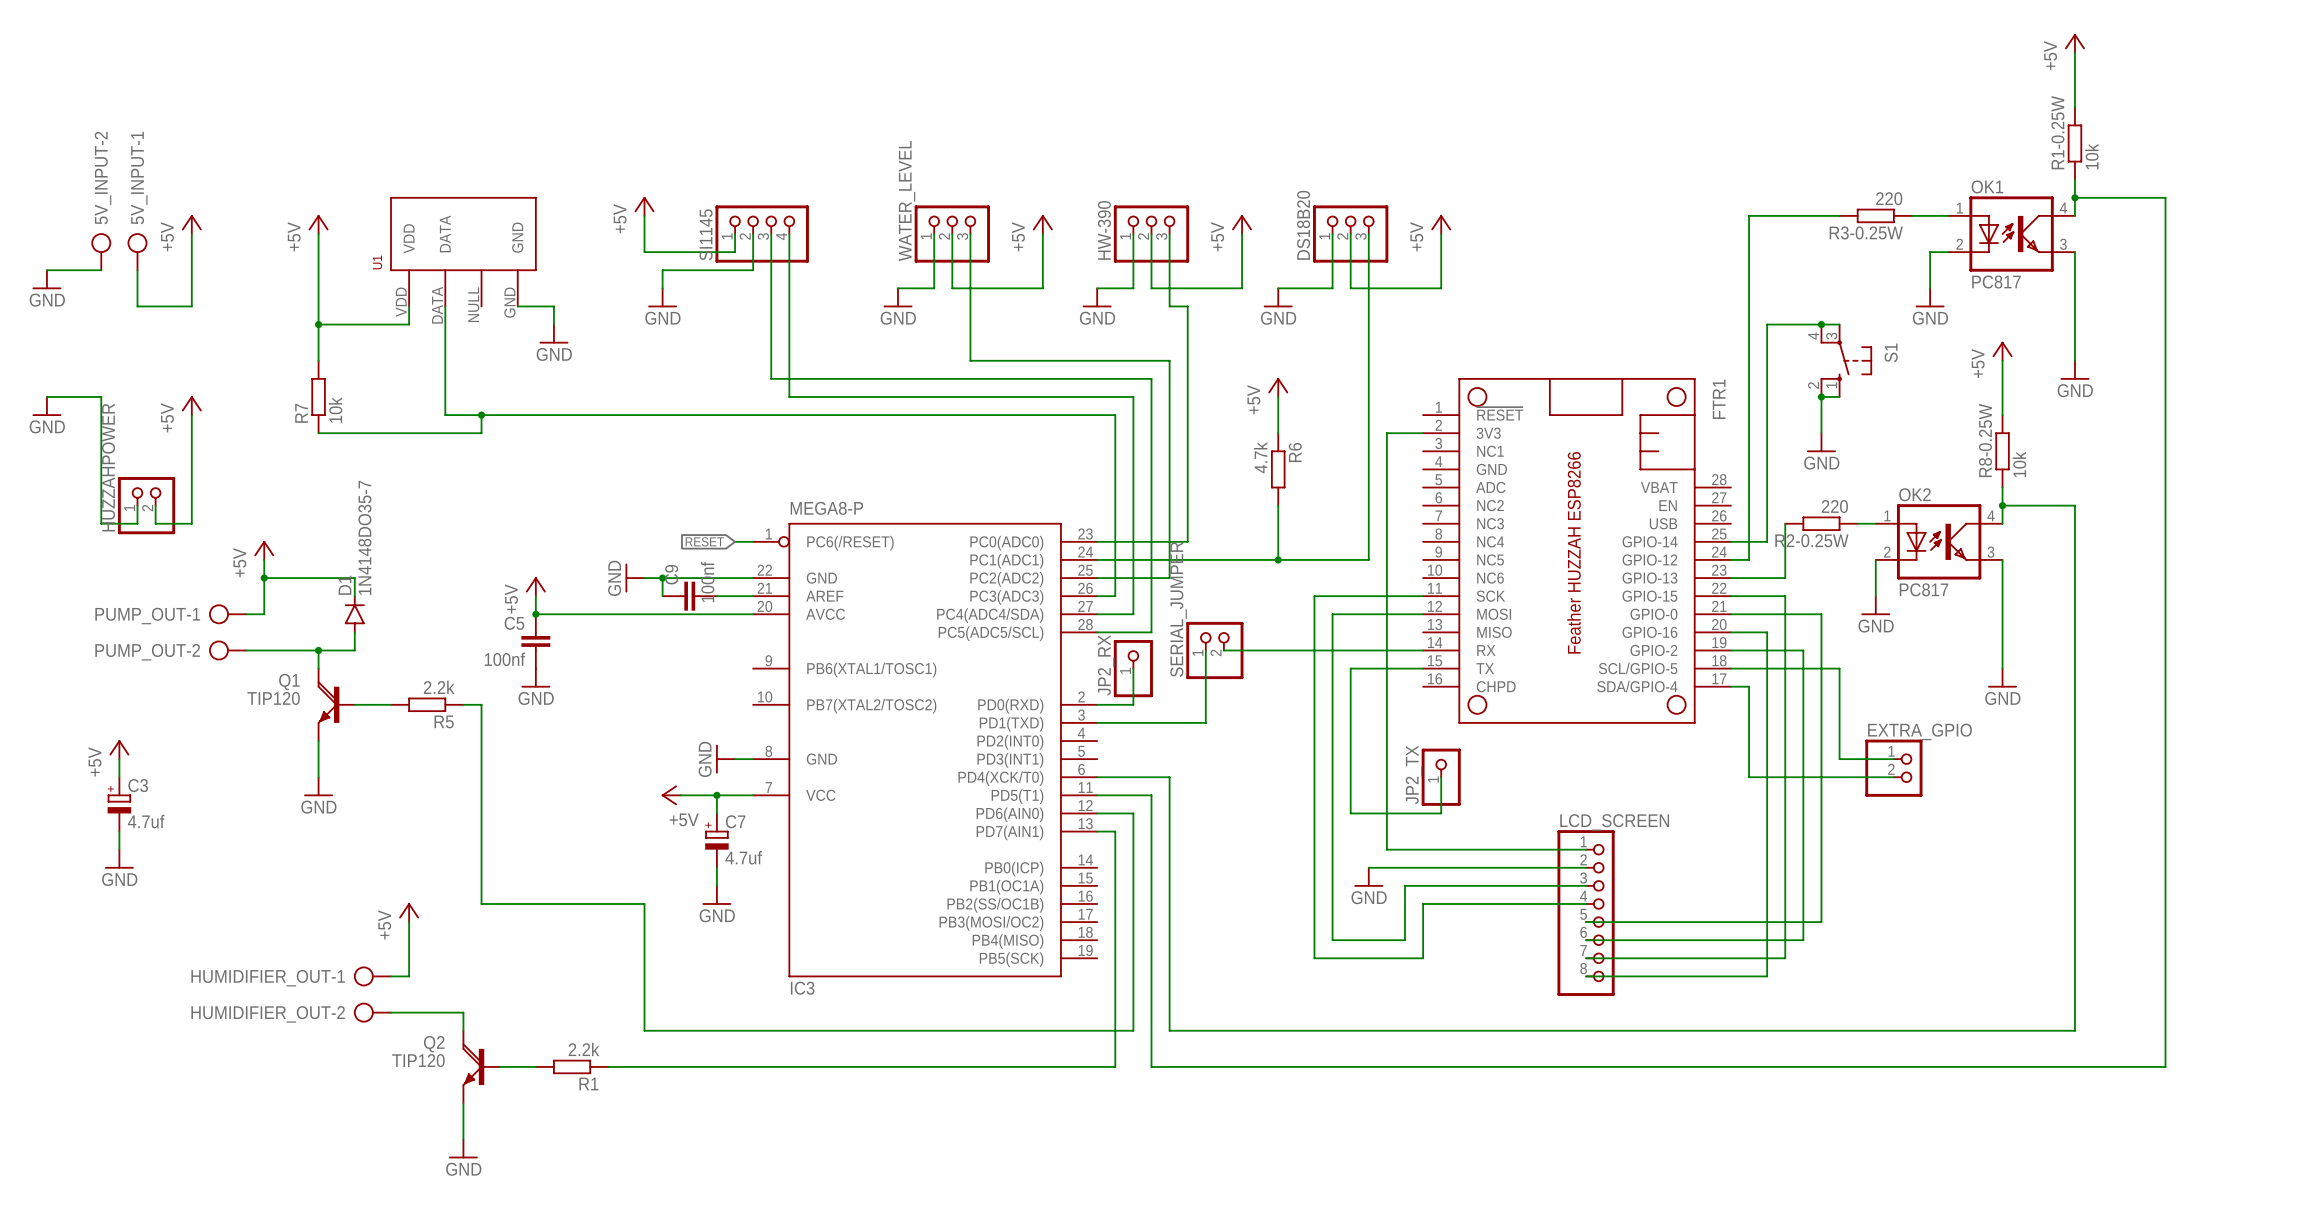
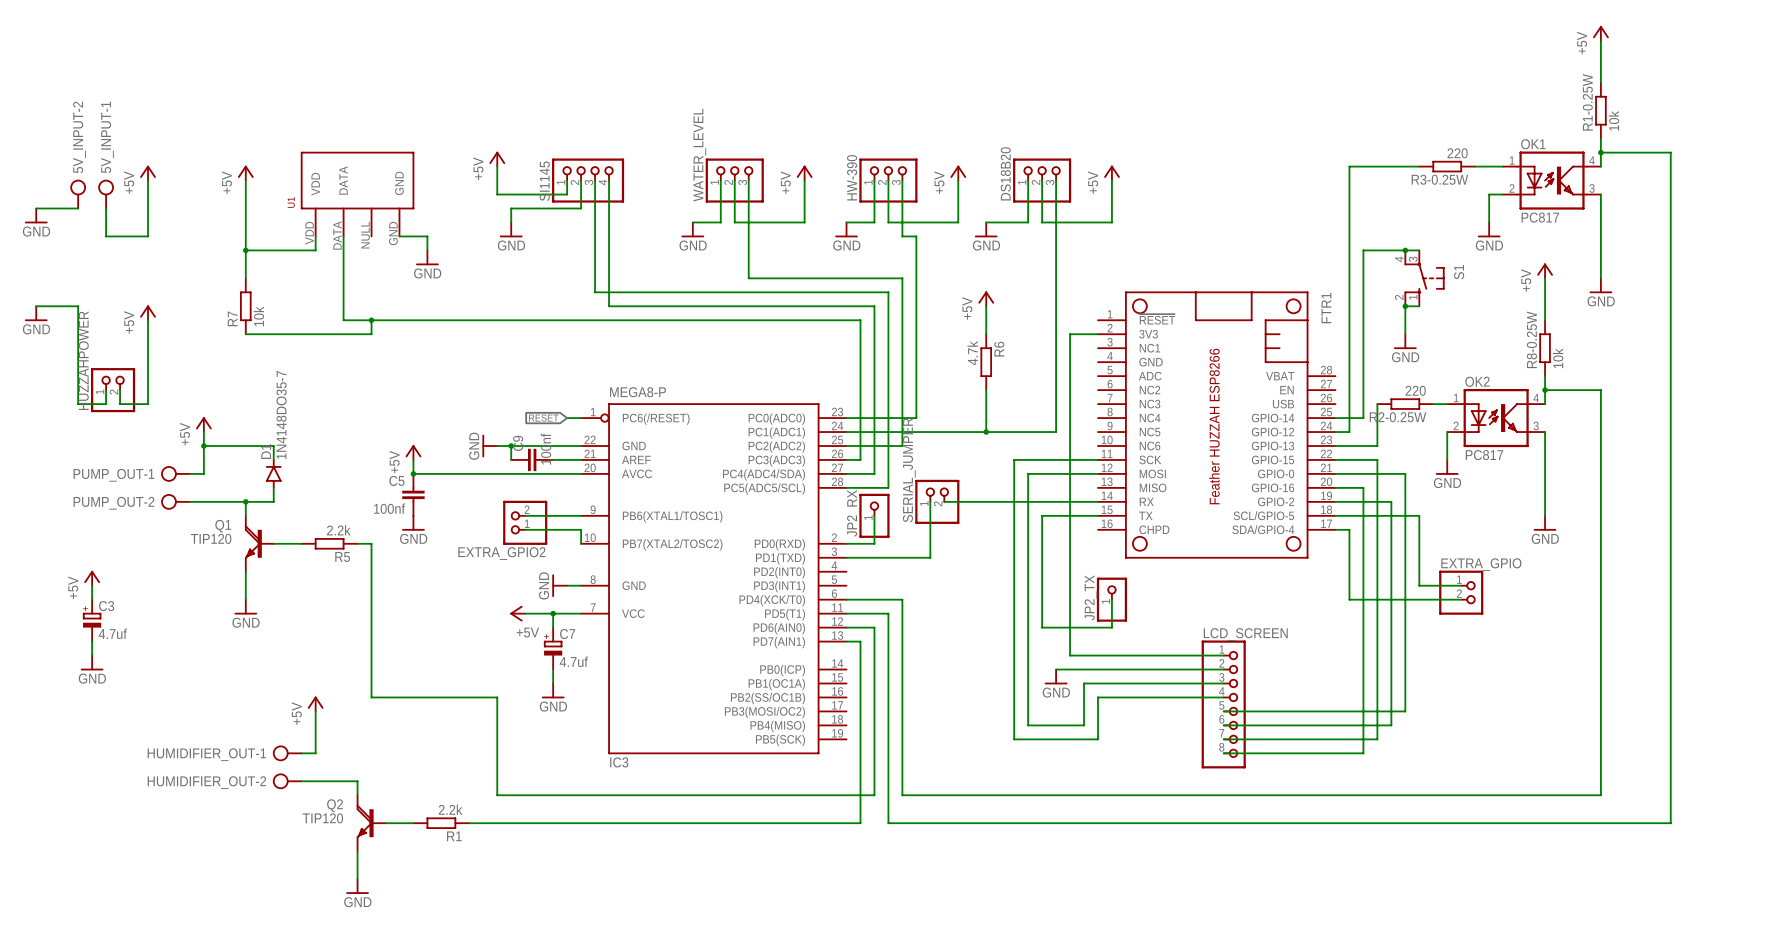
wire: none -> (525, 515) (581, 515)
EXTRA_GPIO2: none -> (525, 522)
wire: none -> (525, 529) (581, 529) (581, 543)

